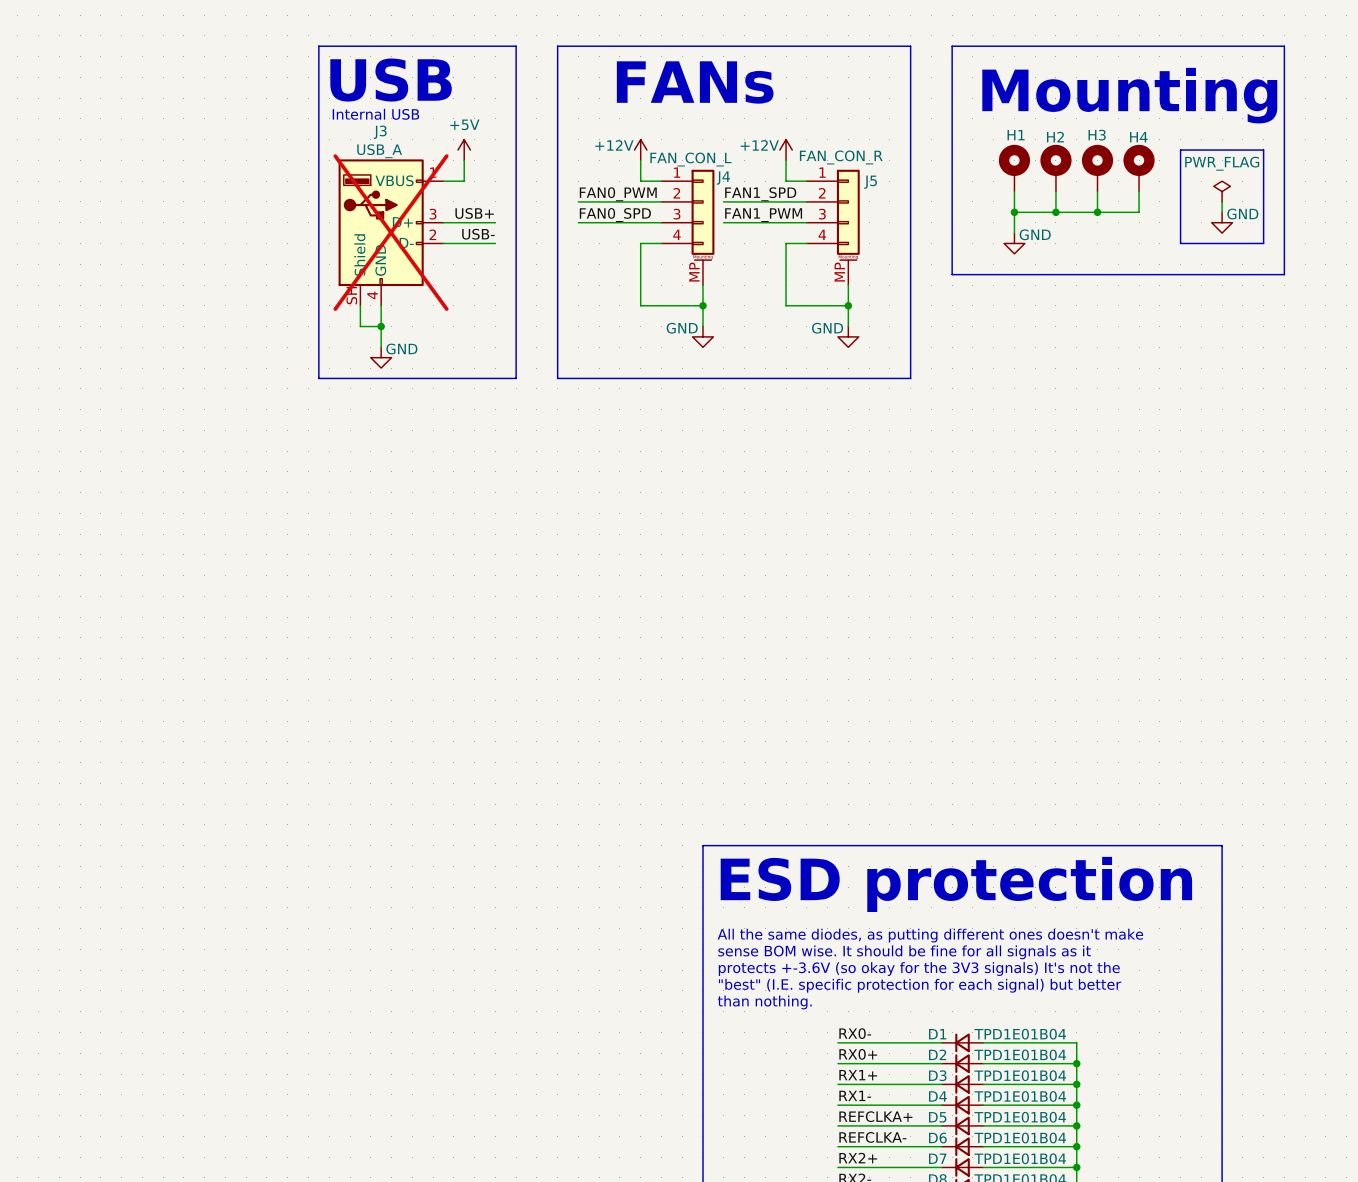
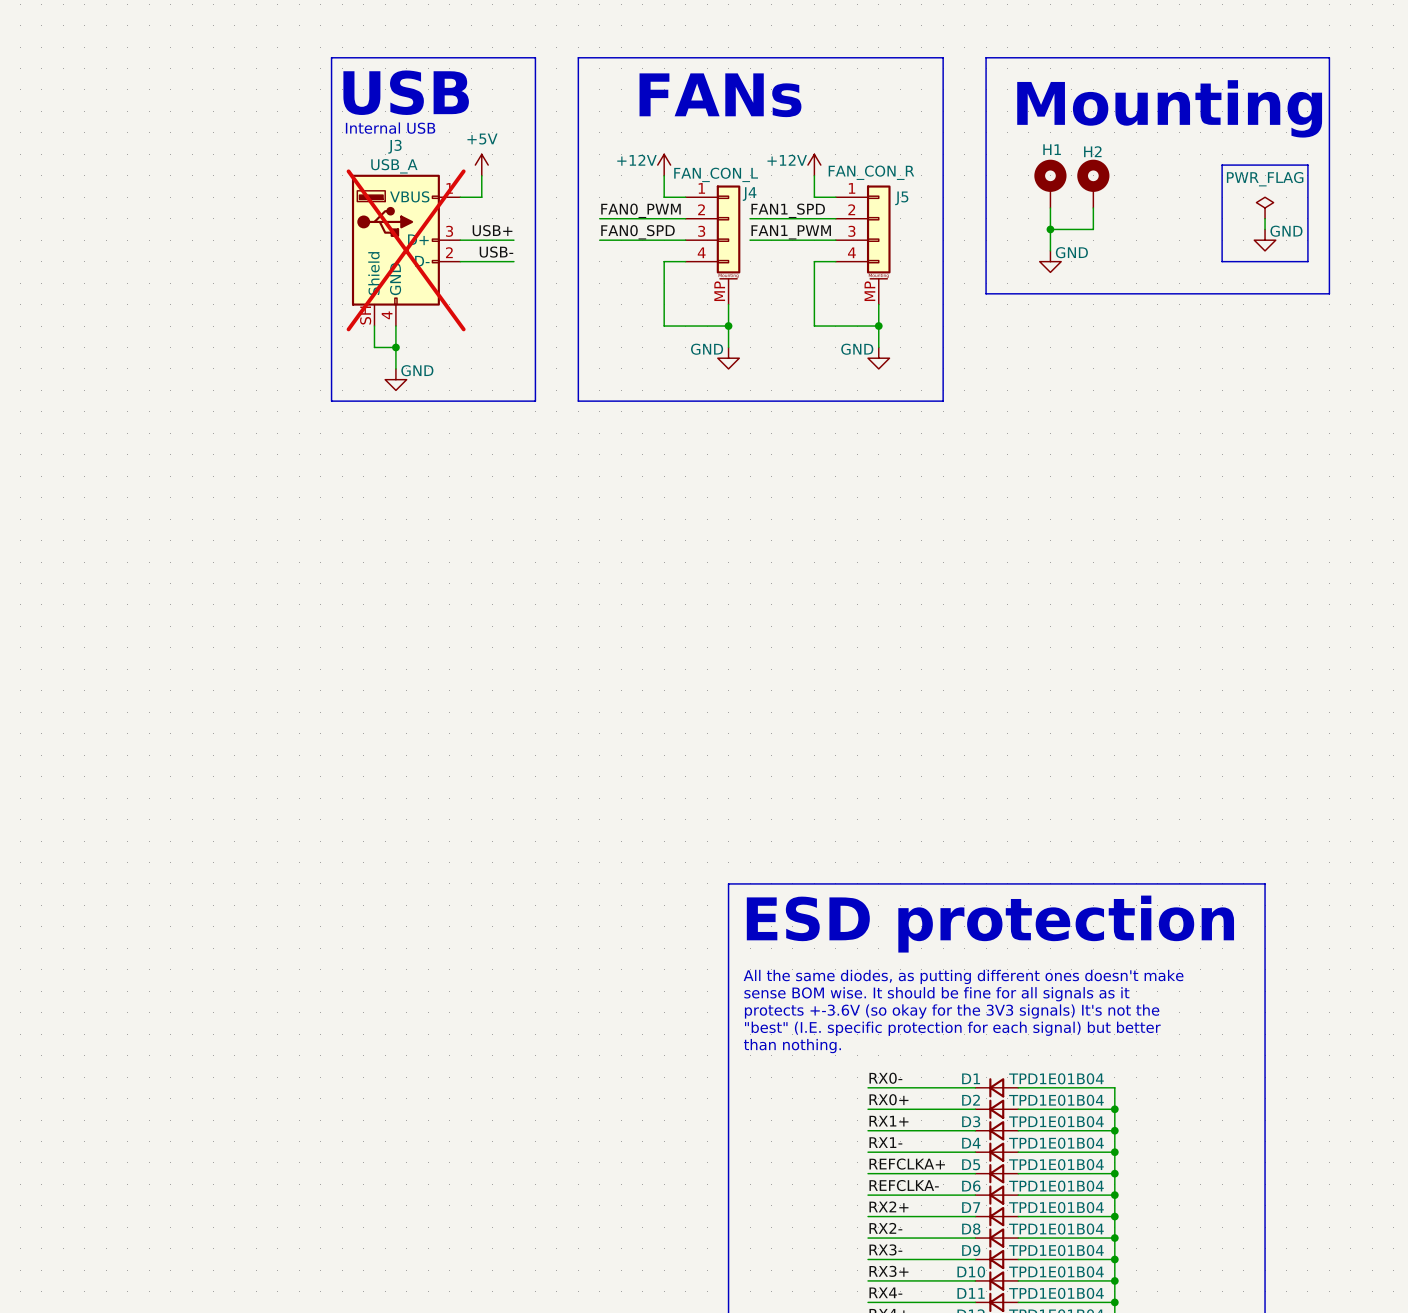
H3: (1097, 168) -> none
H4: (1139, 168) -> none
wire: (1097, 191) (1097, 212) -> none
wire: (1139, 191) (1139, 212) (1055, 212) -> none
junction: (1055, 212) -> none
junction: (1097, 212) -> none

